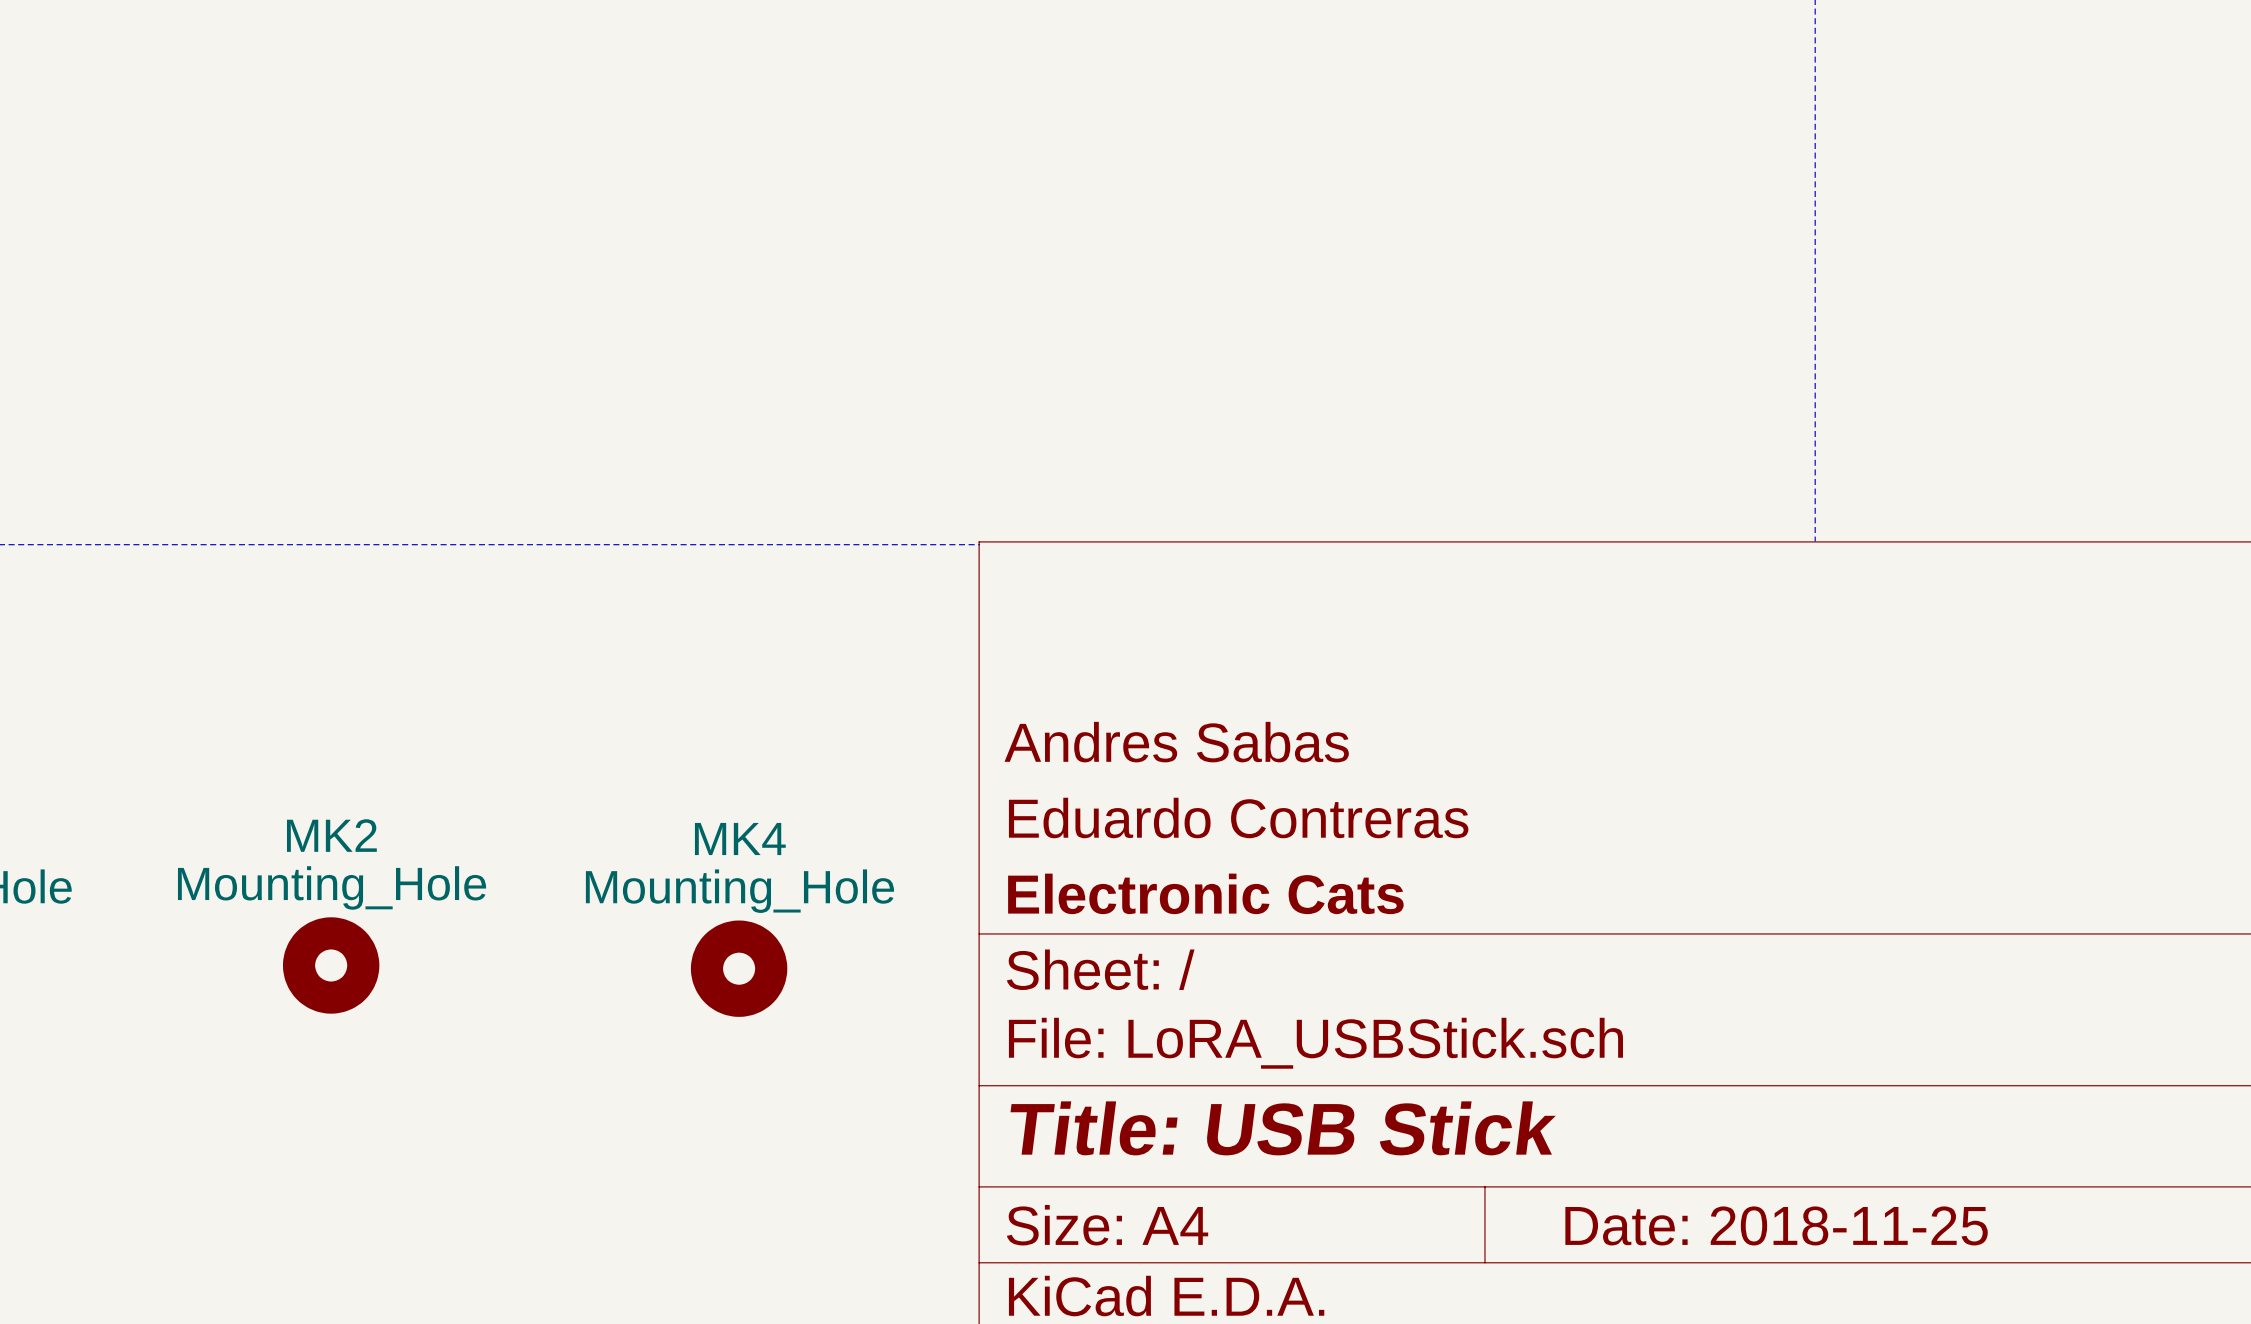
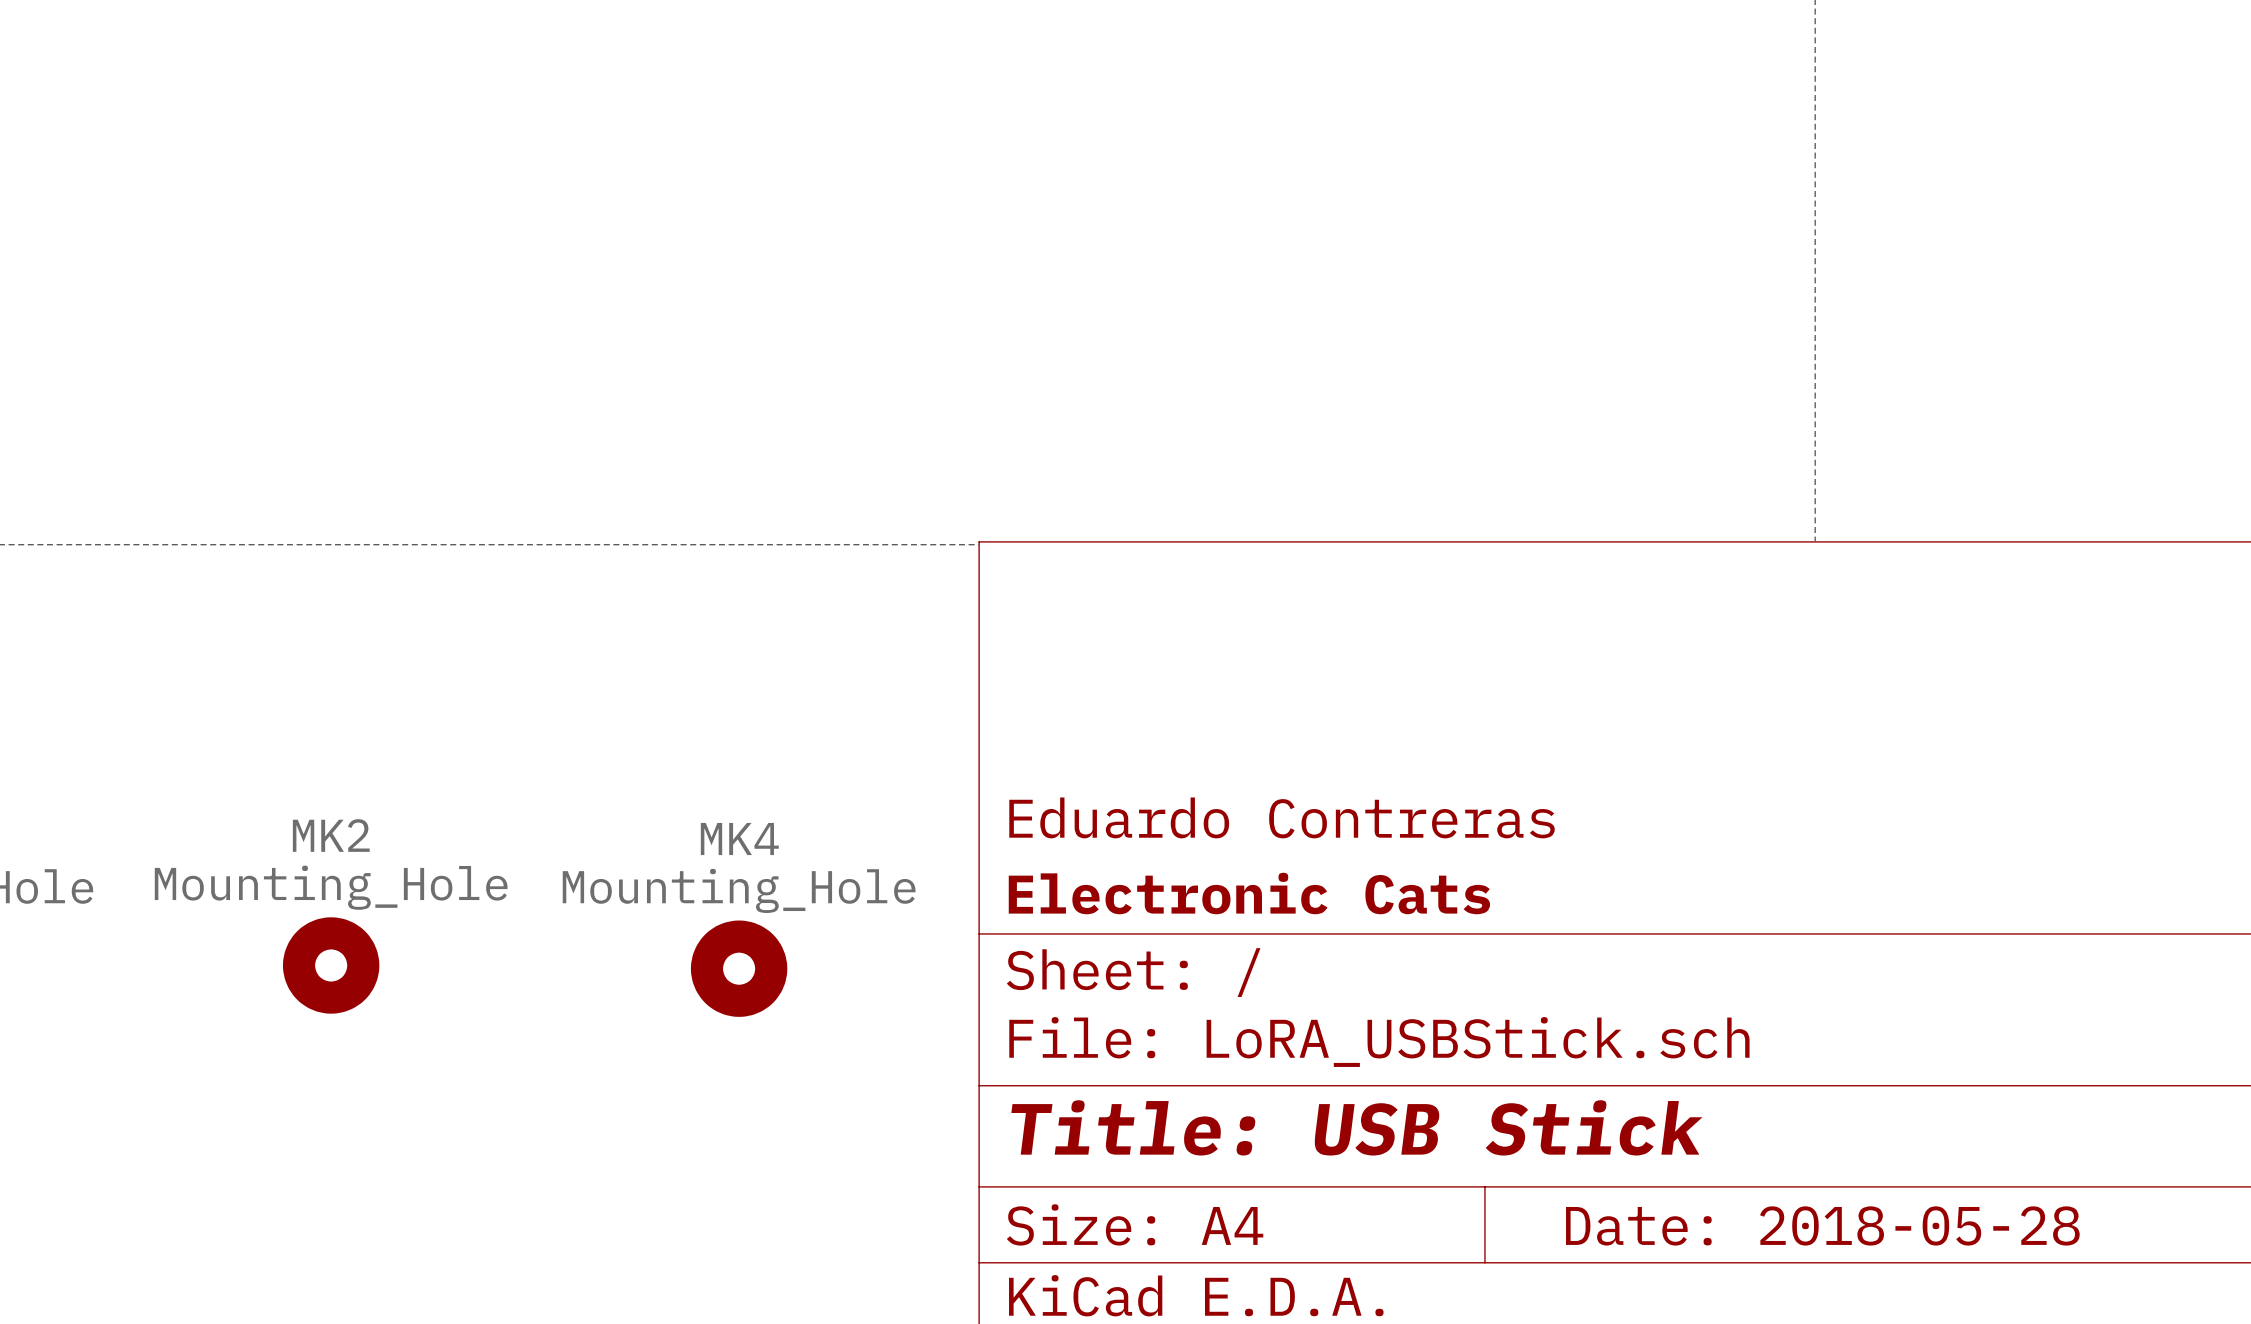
title block: Andres Sabas (1176, 742) -> none
title block: Date: 2018-11-25 (1776, 1225) -> Date: 2018-05-28 (1822, 1225)

